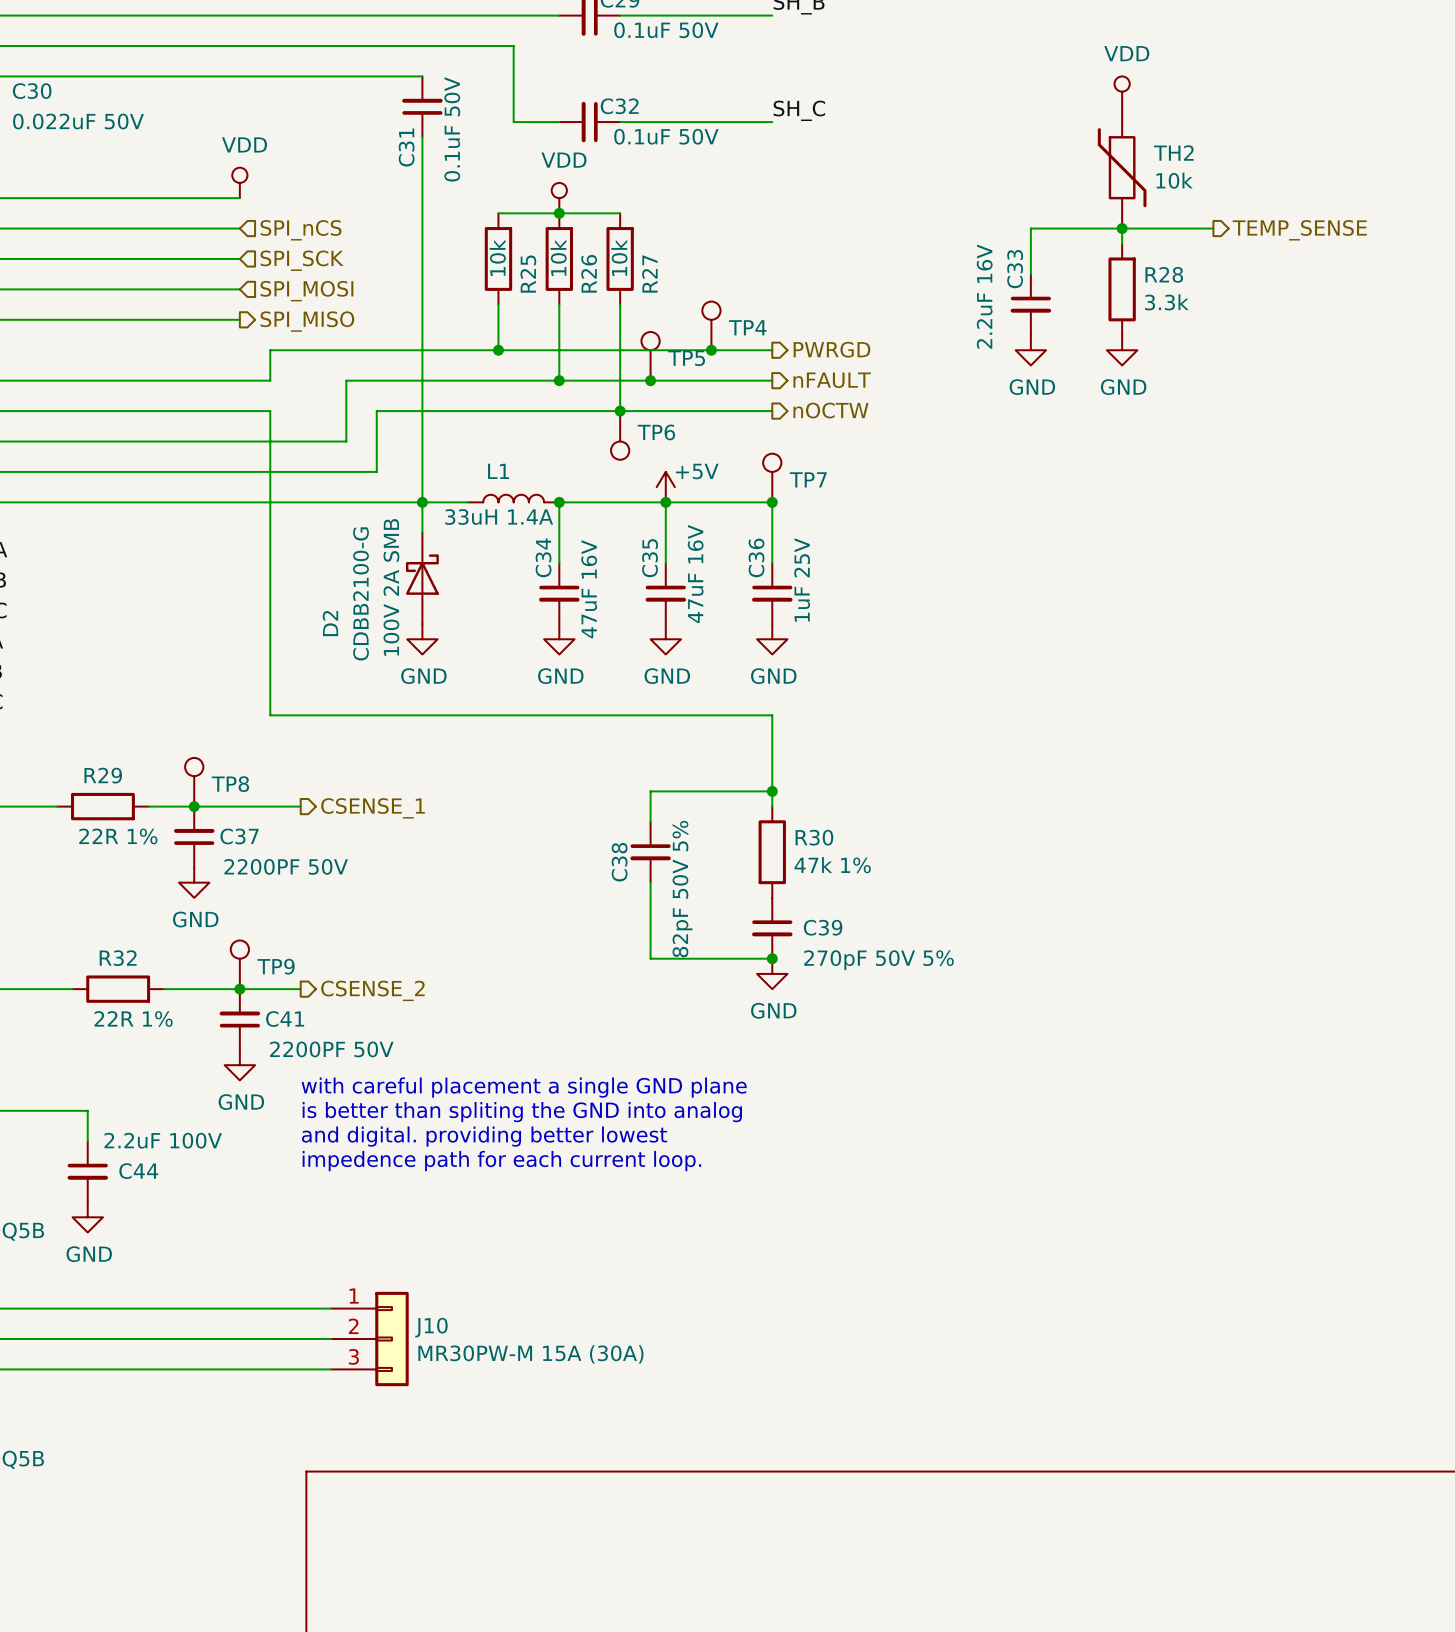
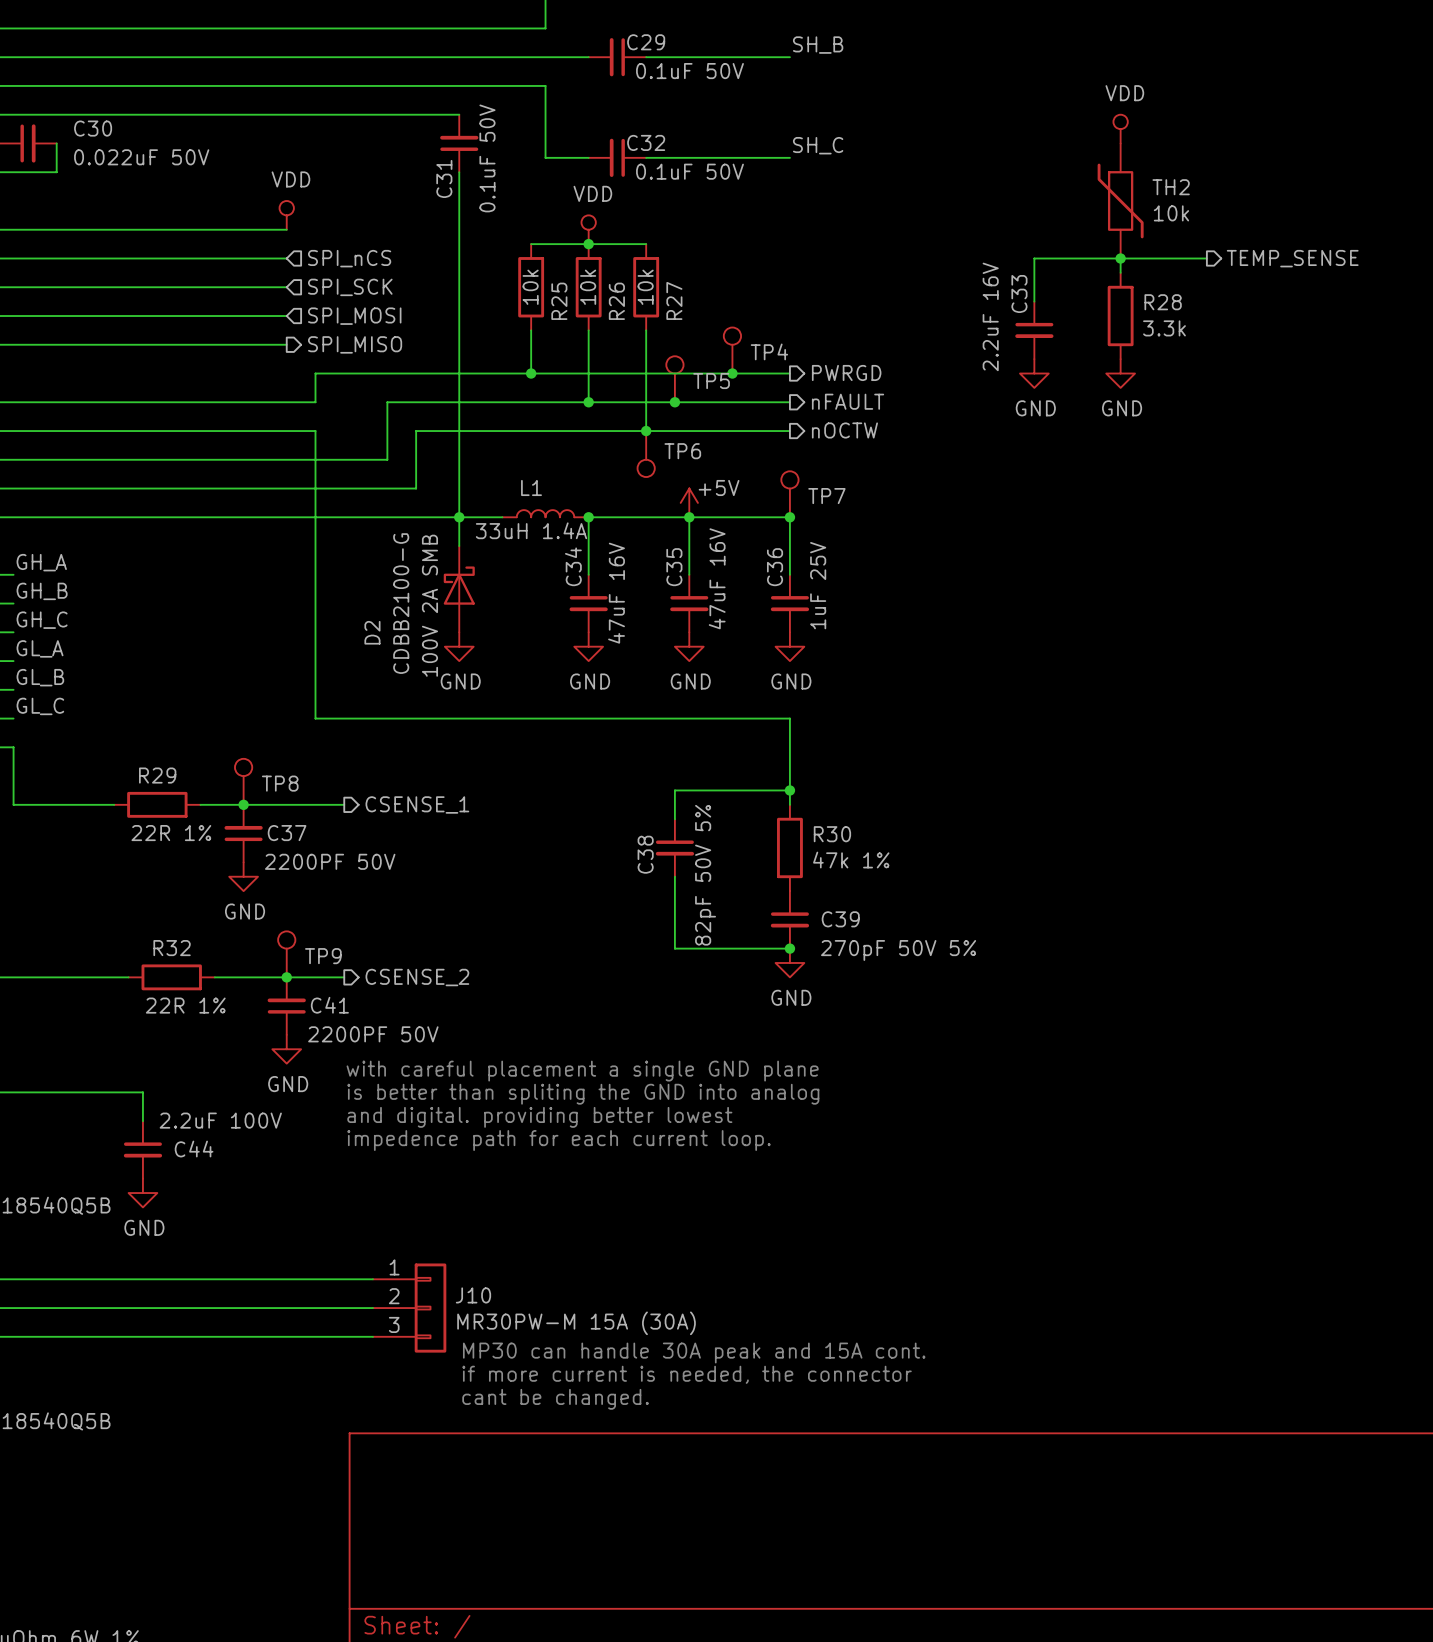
text: none -> MP30 can handle 30A peak and 15A cont. (694, 1353)
text: none -> if more current is needed, the connector (687, 1374)
text: none -> cant be changed. (555, 1399)

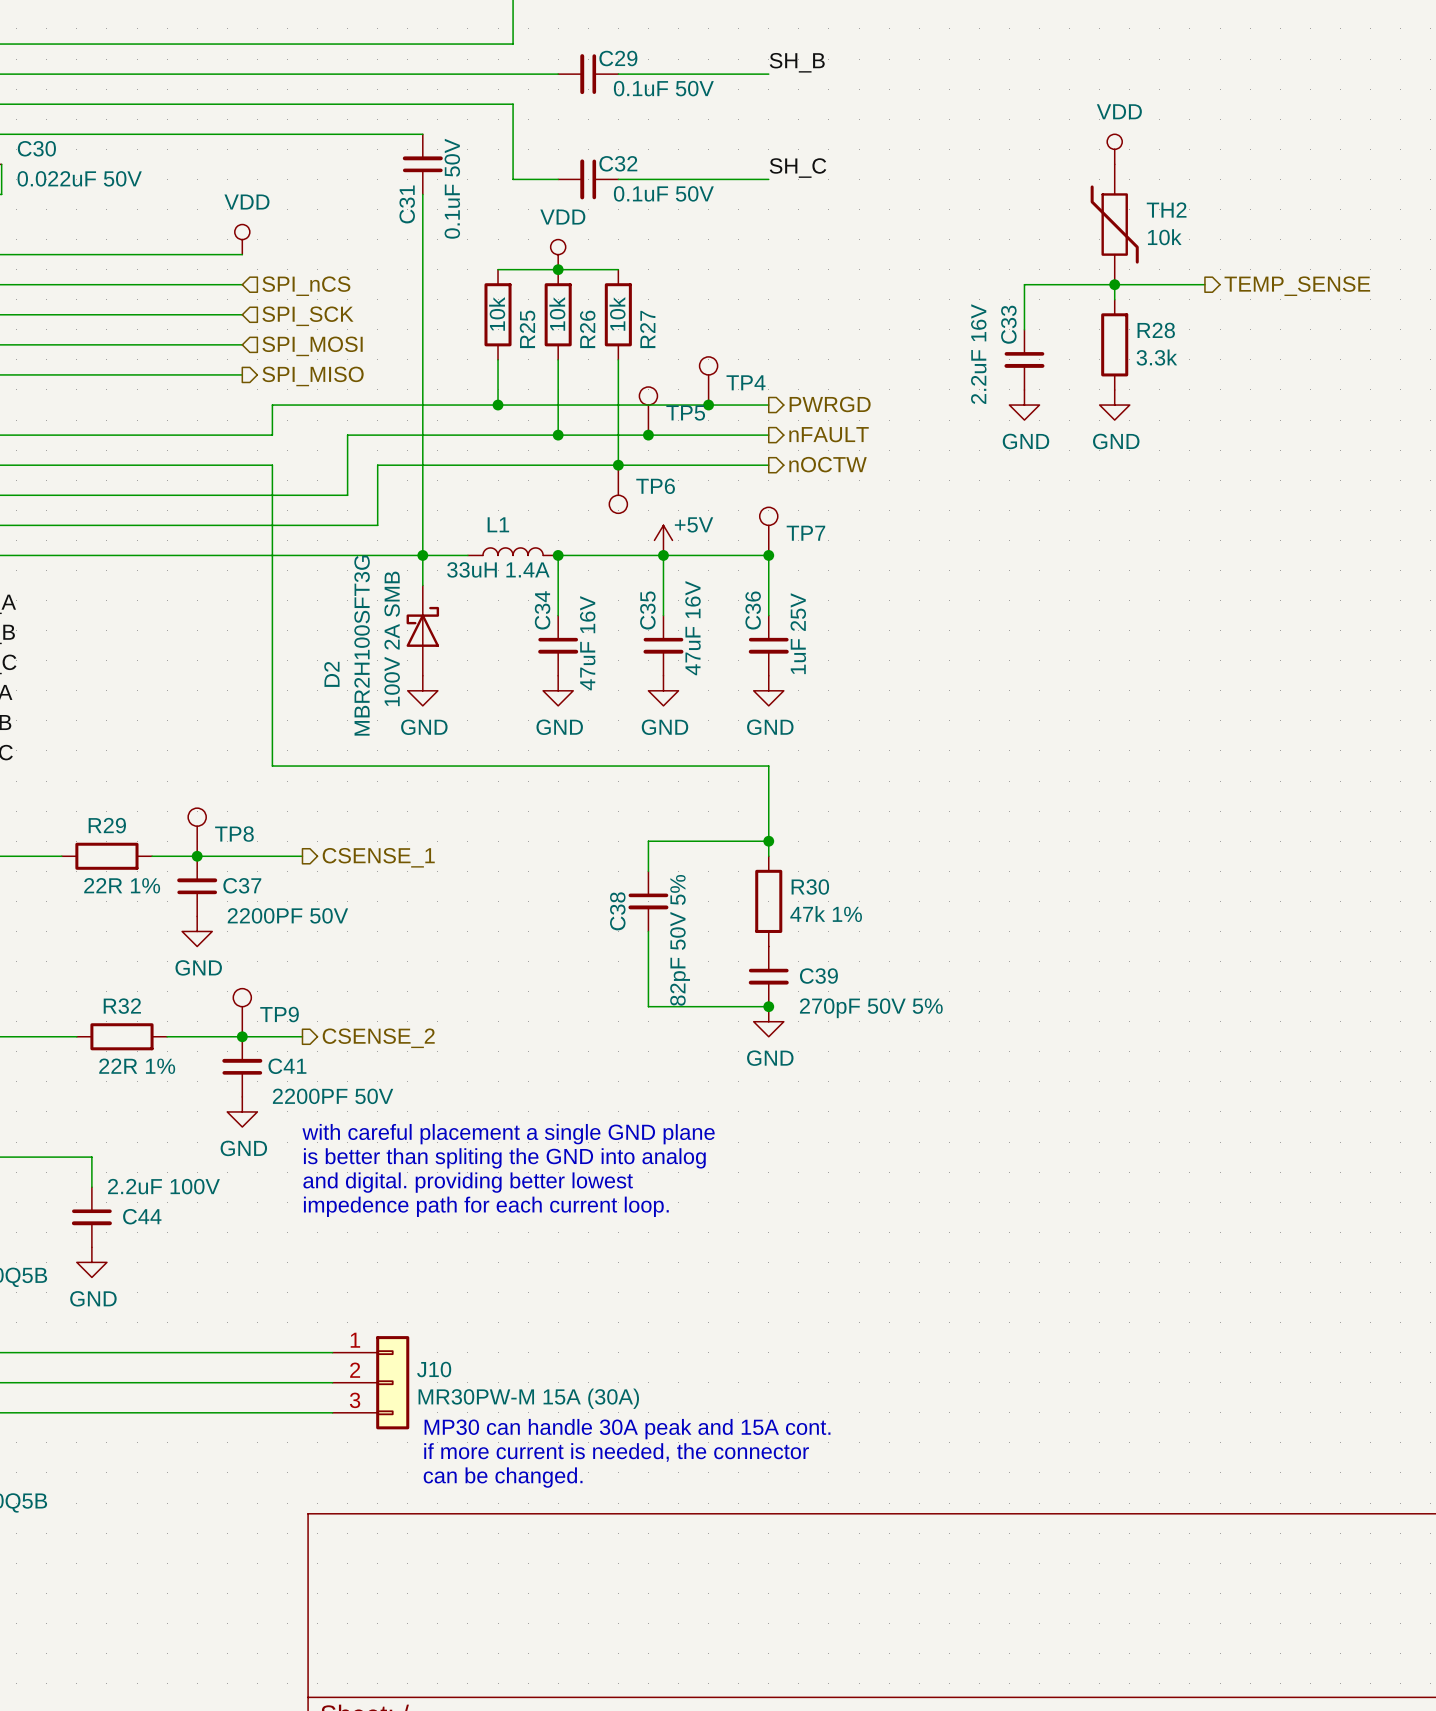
D2 text: CDBB2100-G (401, 603) -> MBR2H100SFT3G (362, 645)
text: cant be changed. (555, 1399) -> can be changed. (503, 1477)

